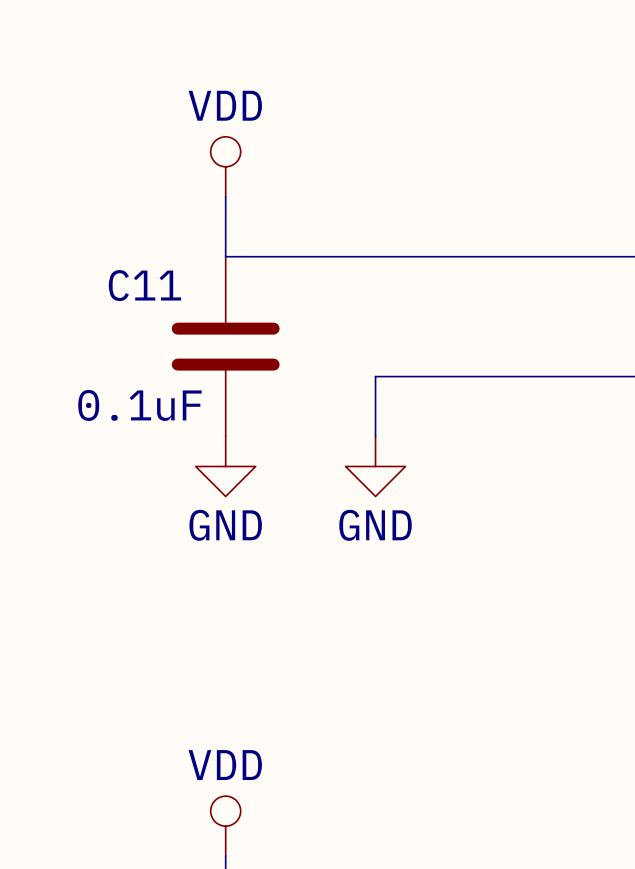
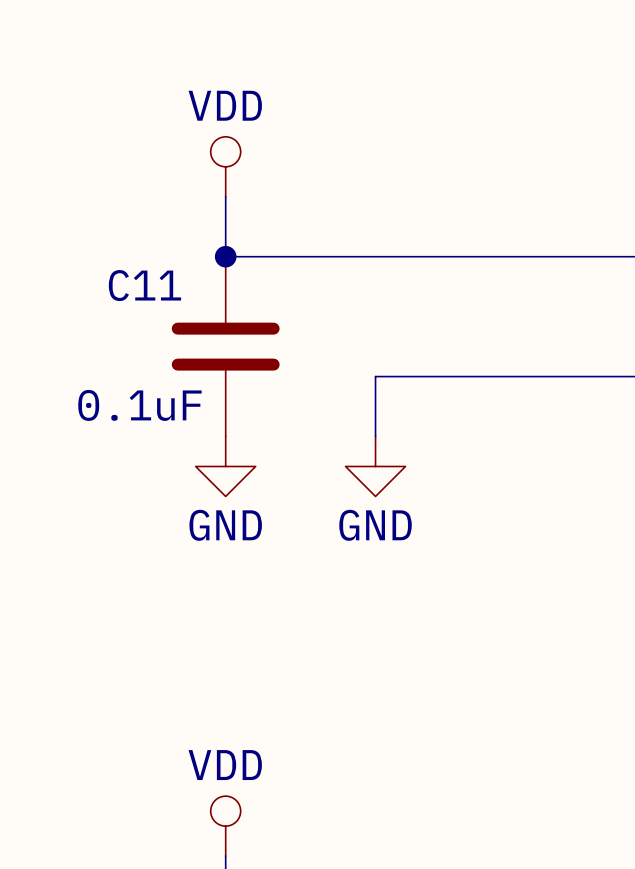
junction: none -> (225, 256)

